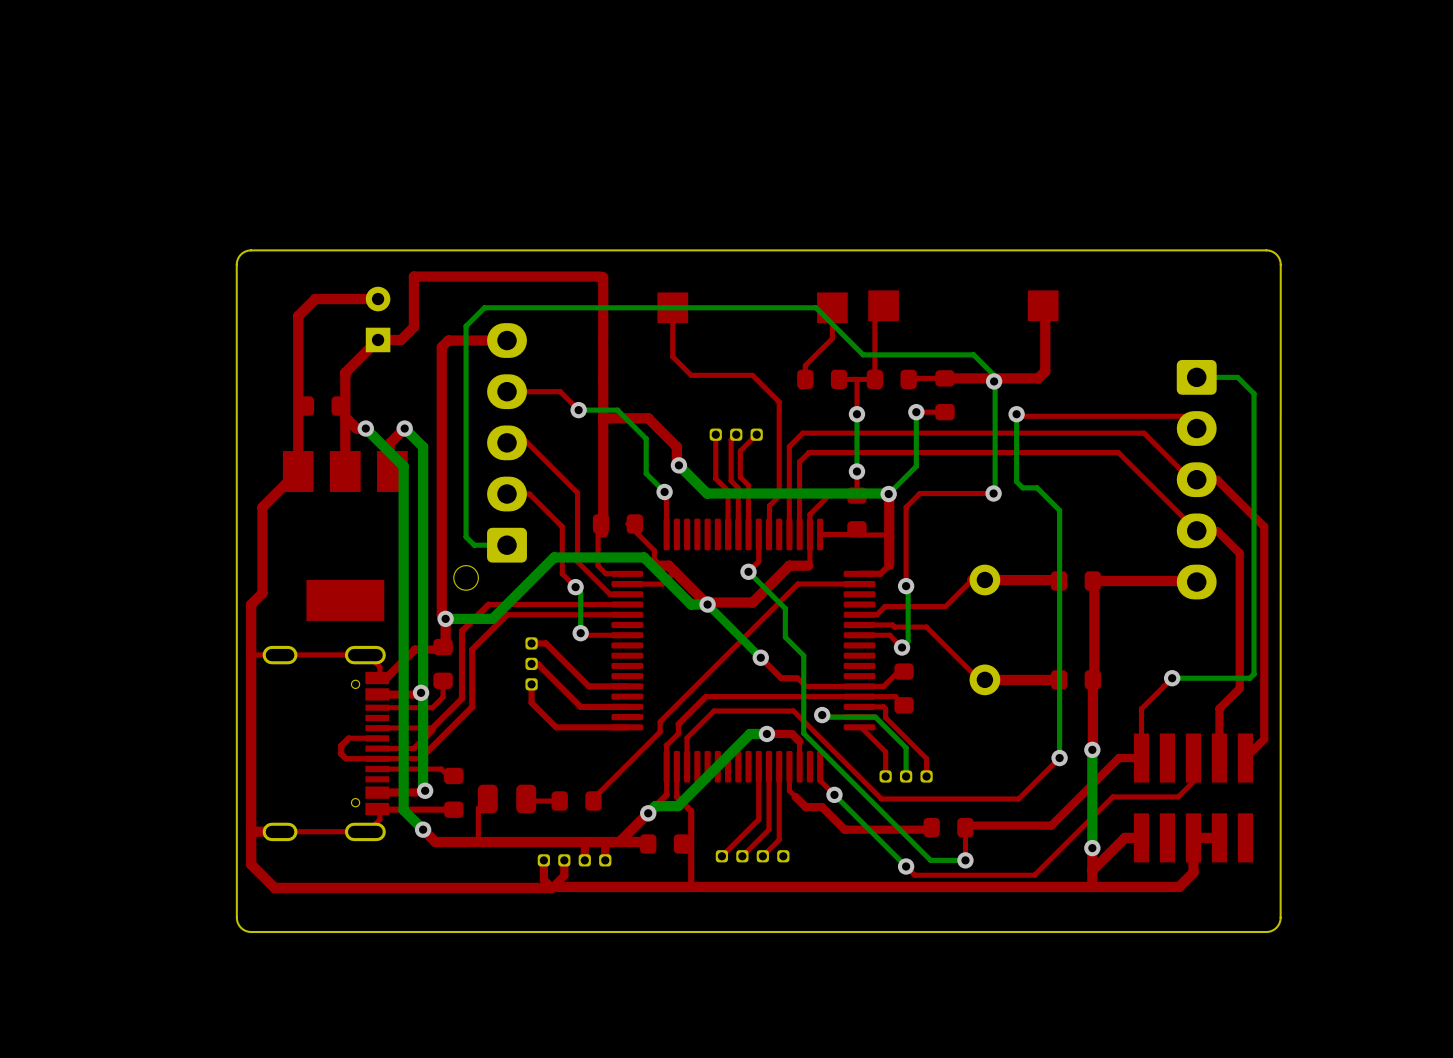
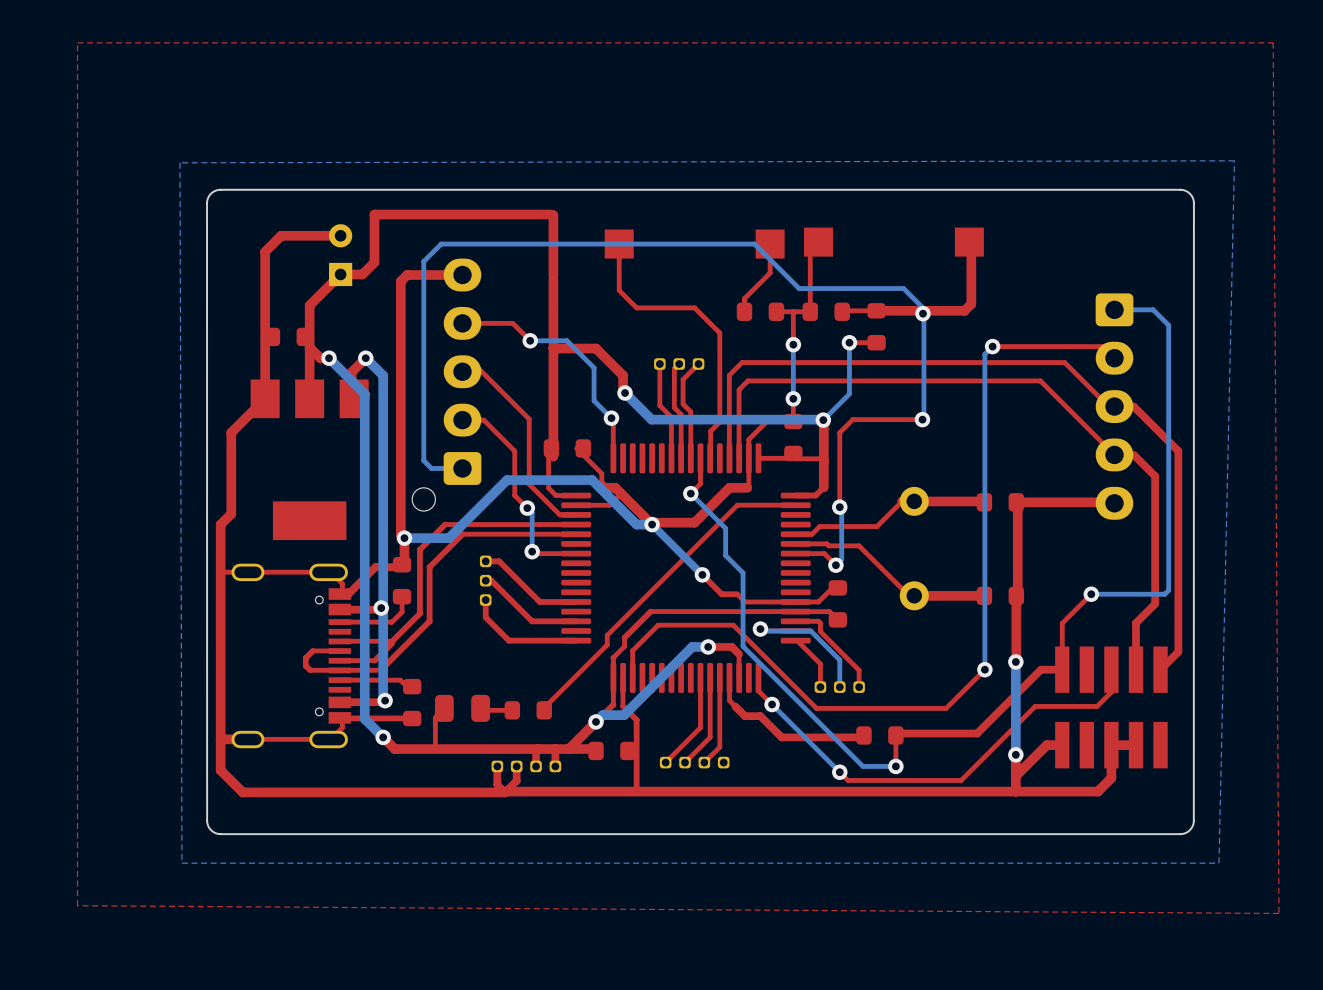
top zone outline: none -> (1273, 42) (77, 42) (77, 905) (1278, 913) (1273, 42)
bottom zone outline: none -> (1234, 160) (180, 162) (181, 863) (1218, 863) (1234, 160)
top track: (1016, 414) (1018, 416) (1067, 416) -> none
bottom track: (1016, 414) (1016, 481) (1022, 487) (1037, 487) (1059, 510) -> (992, 346) (984, 354) (984, 435)
via position: (1016, 414) -> (992, 346)

